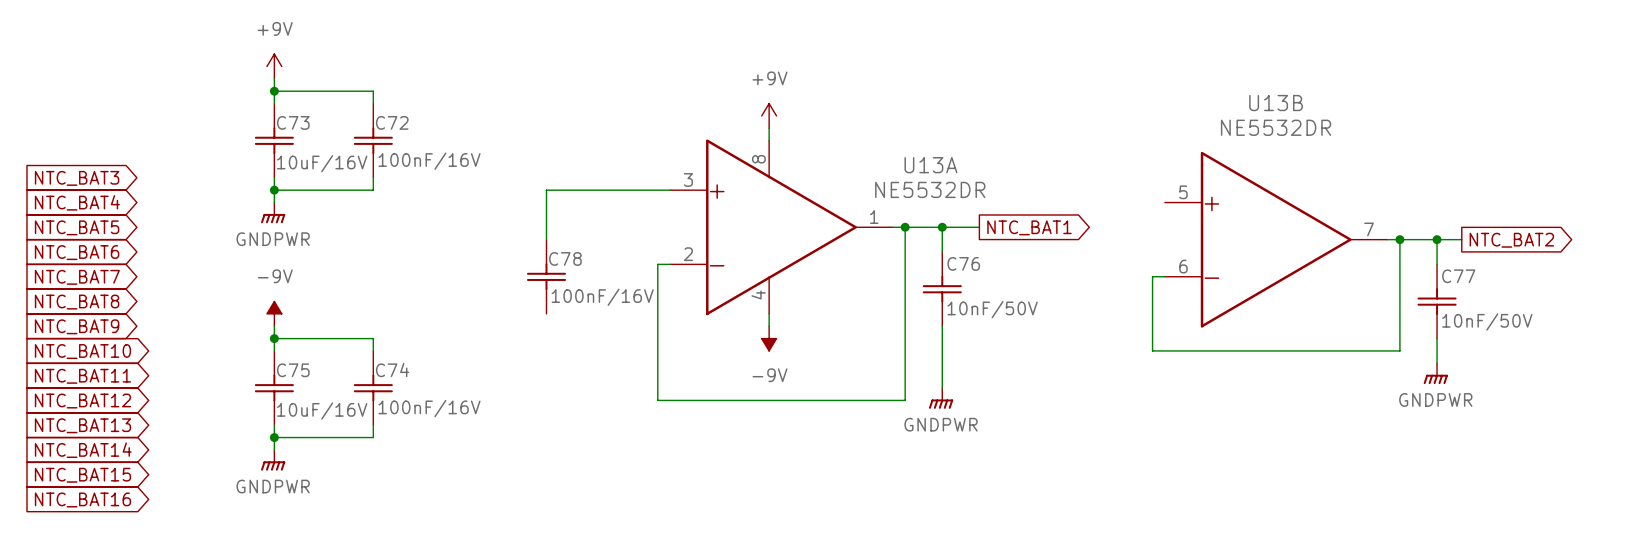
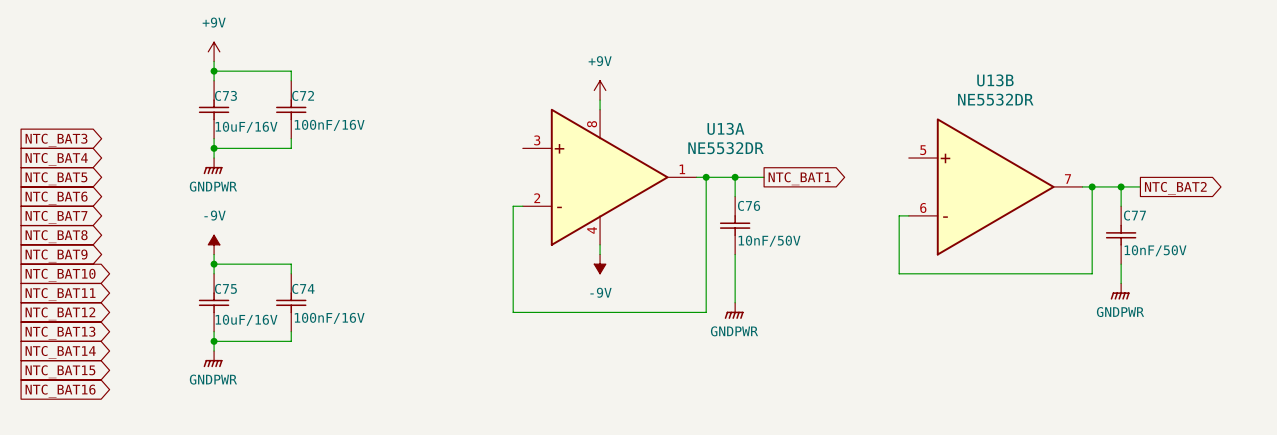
wire: (670, 190) (546, 190) (546, 239) -> none
C78: 100nF/16V (546, 276) -> none

